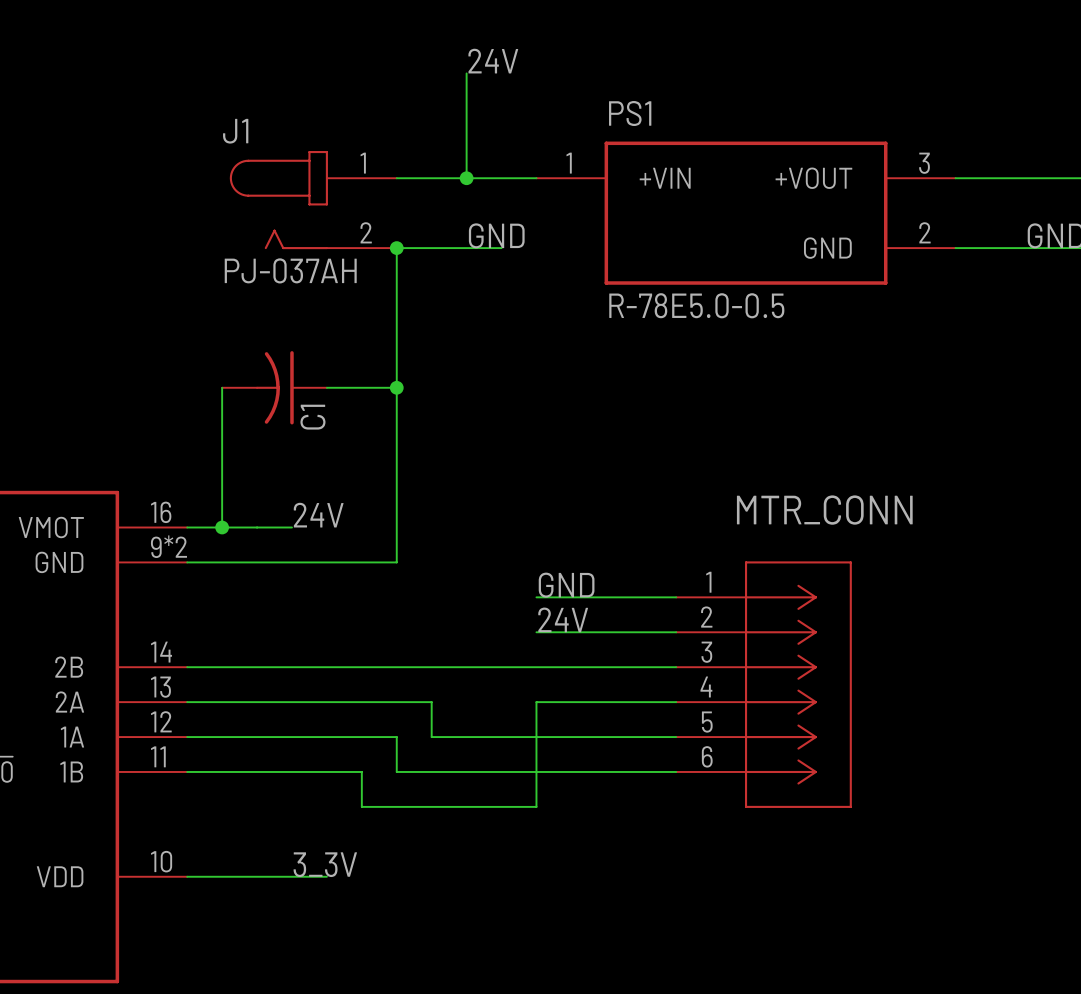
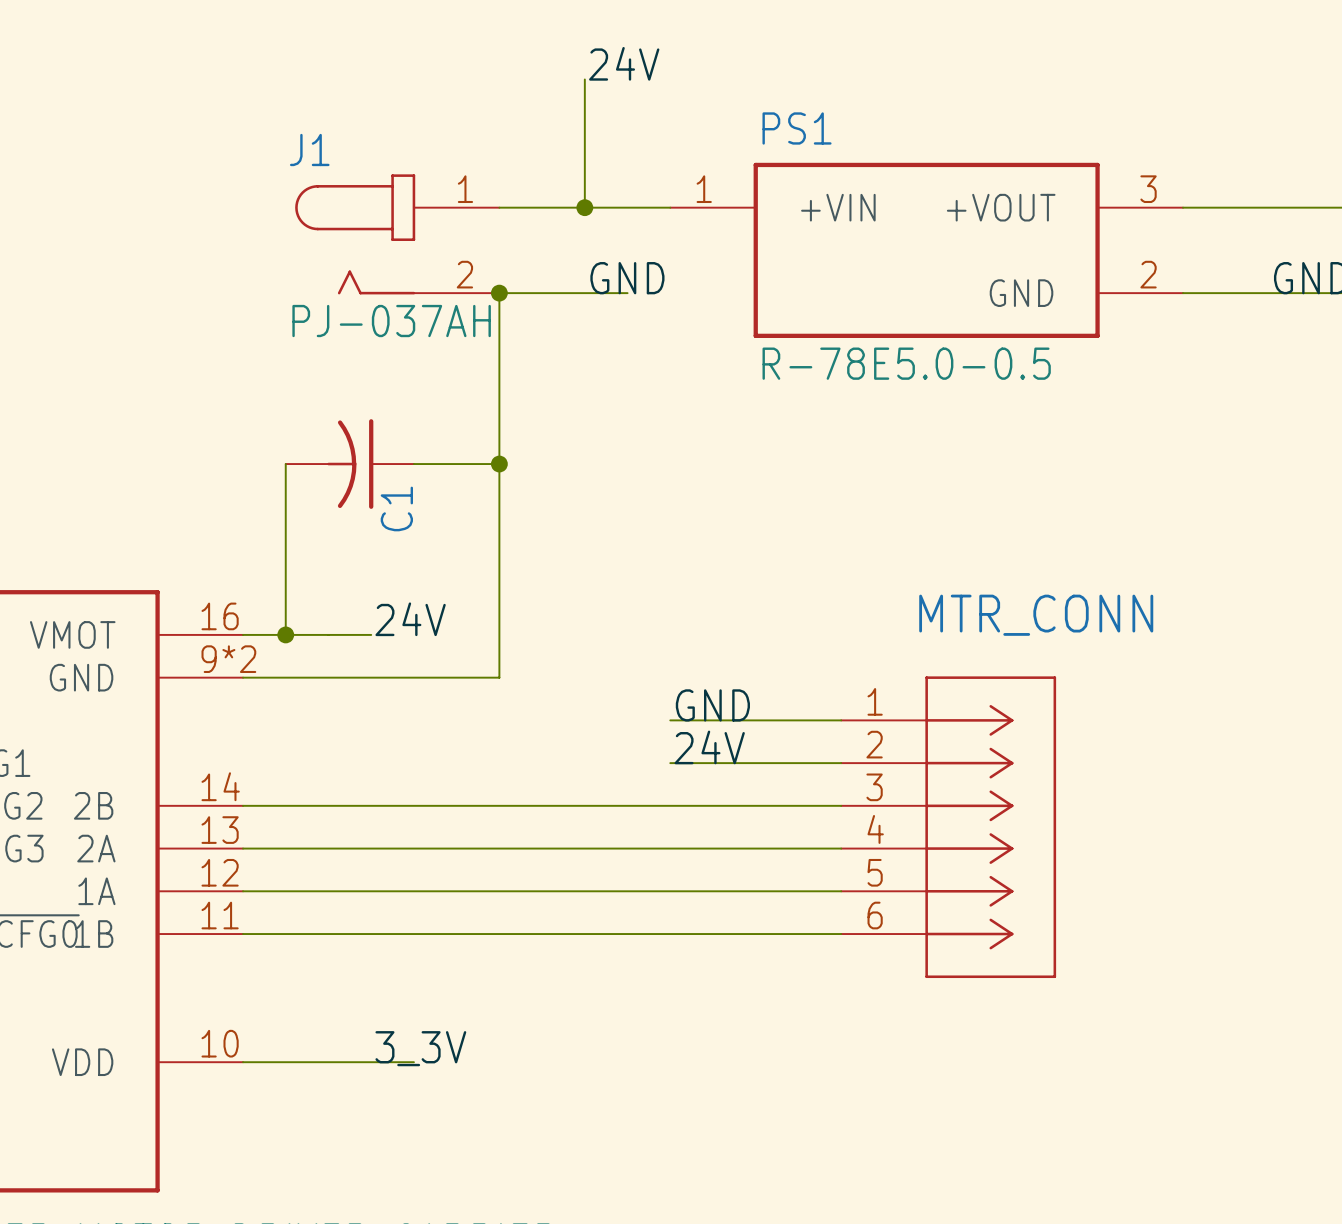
wire: (431, 702) (431, 737) -> (499, 891) (542, 891)
wire: (536, 702) (536, 806) (361, 806) (361, 771) -> (670, 848) (542, 848)
wire: (396, 737) (396, 771) -> (456, 934) (499, 934)

